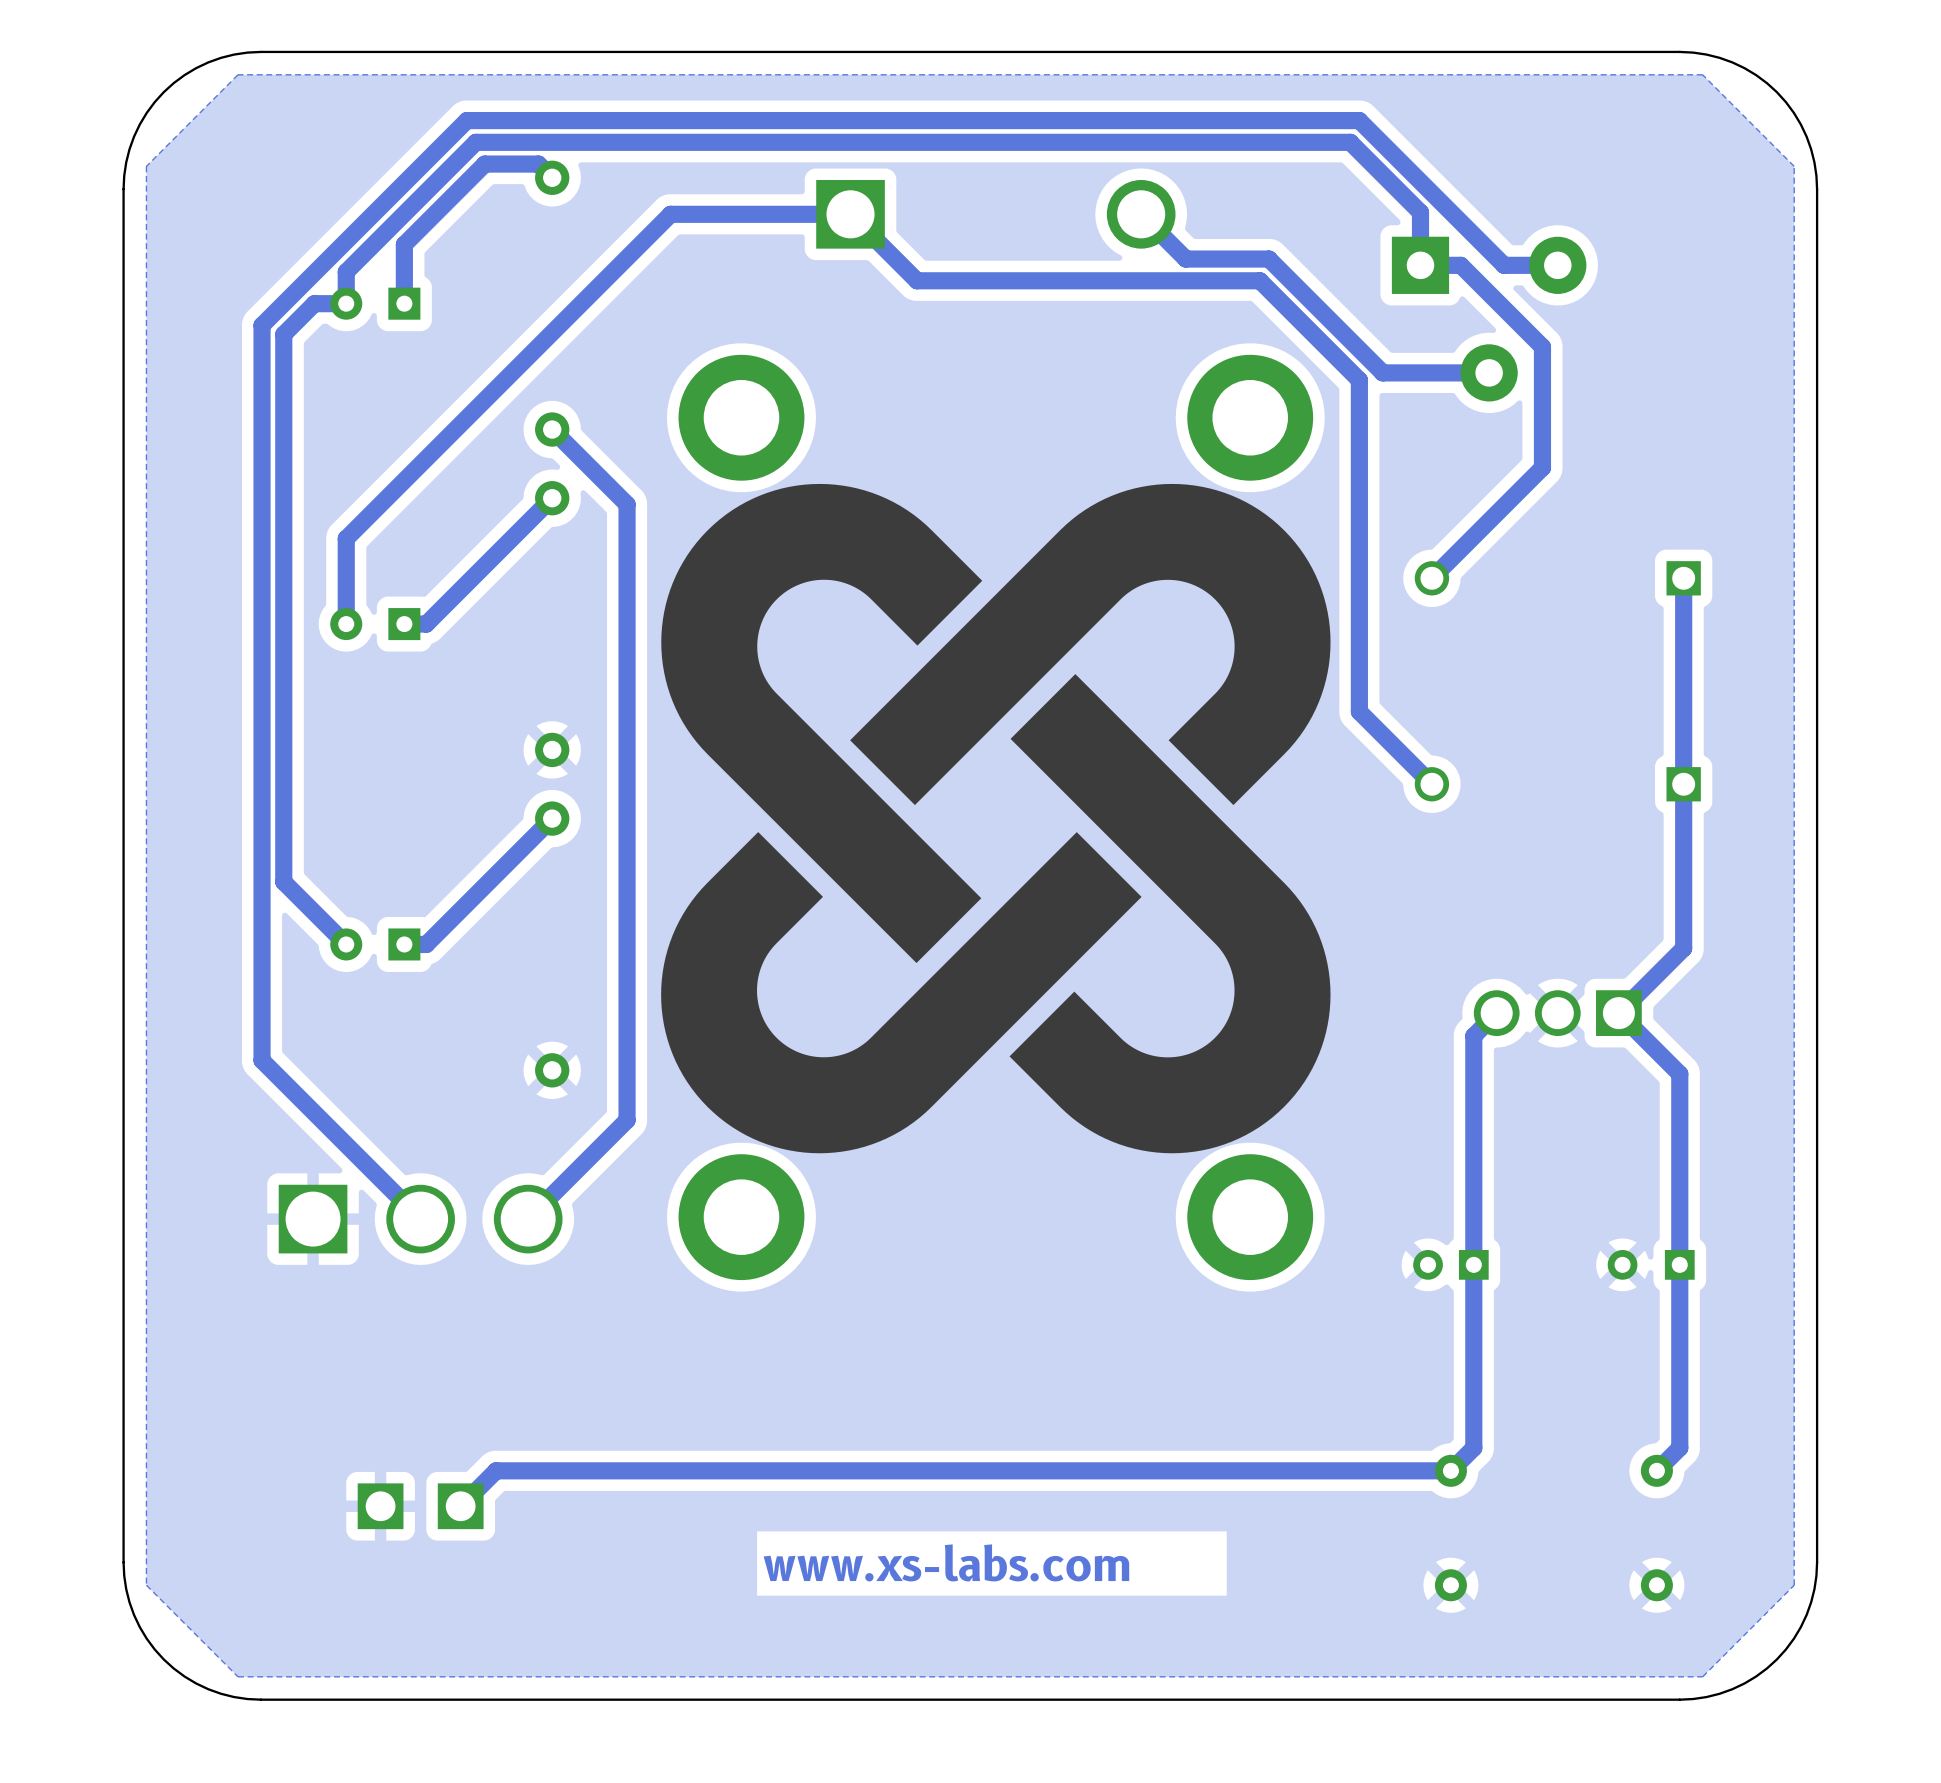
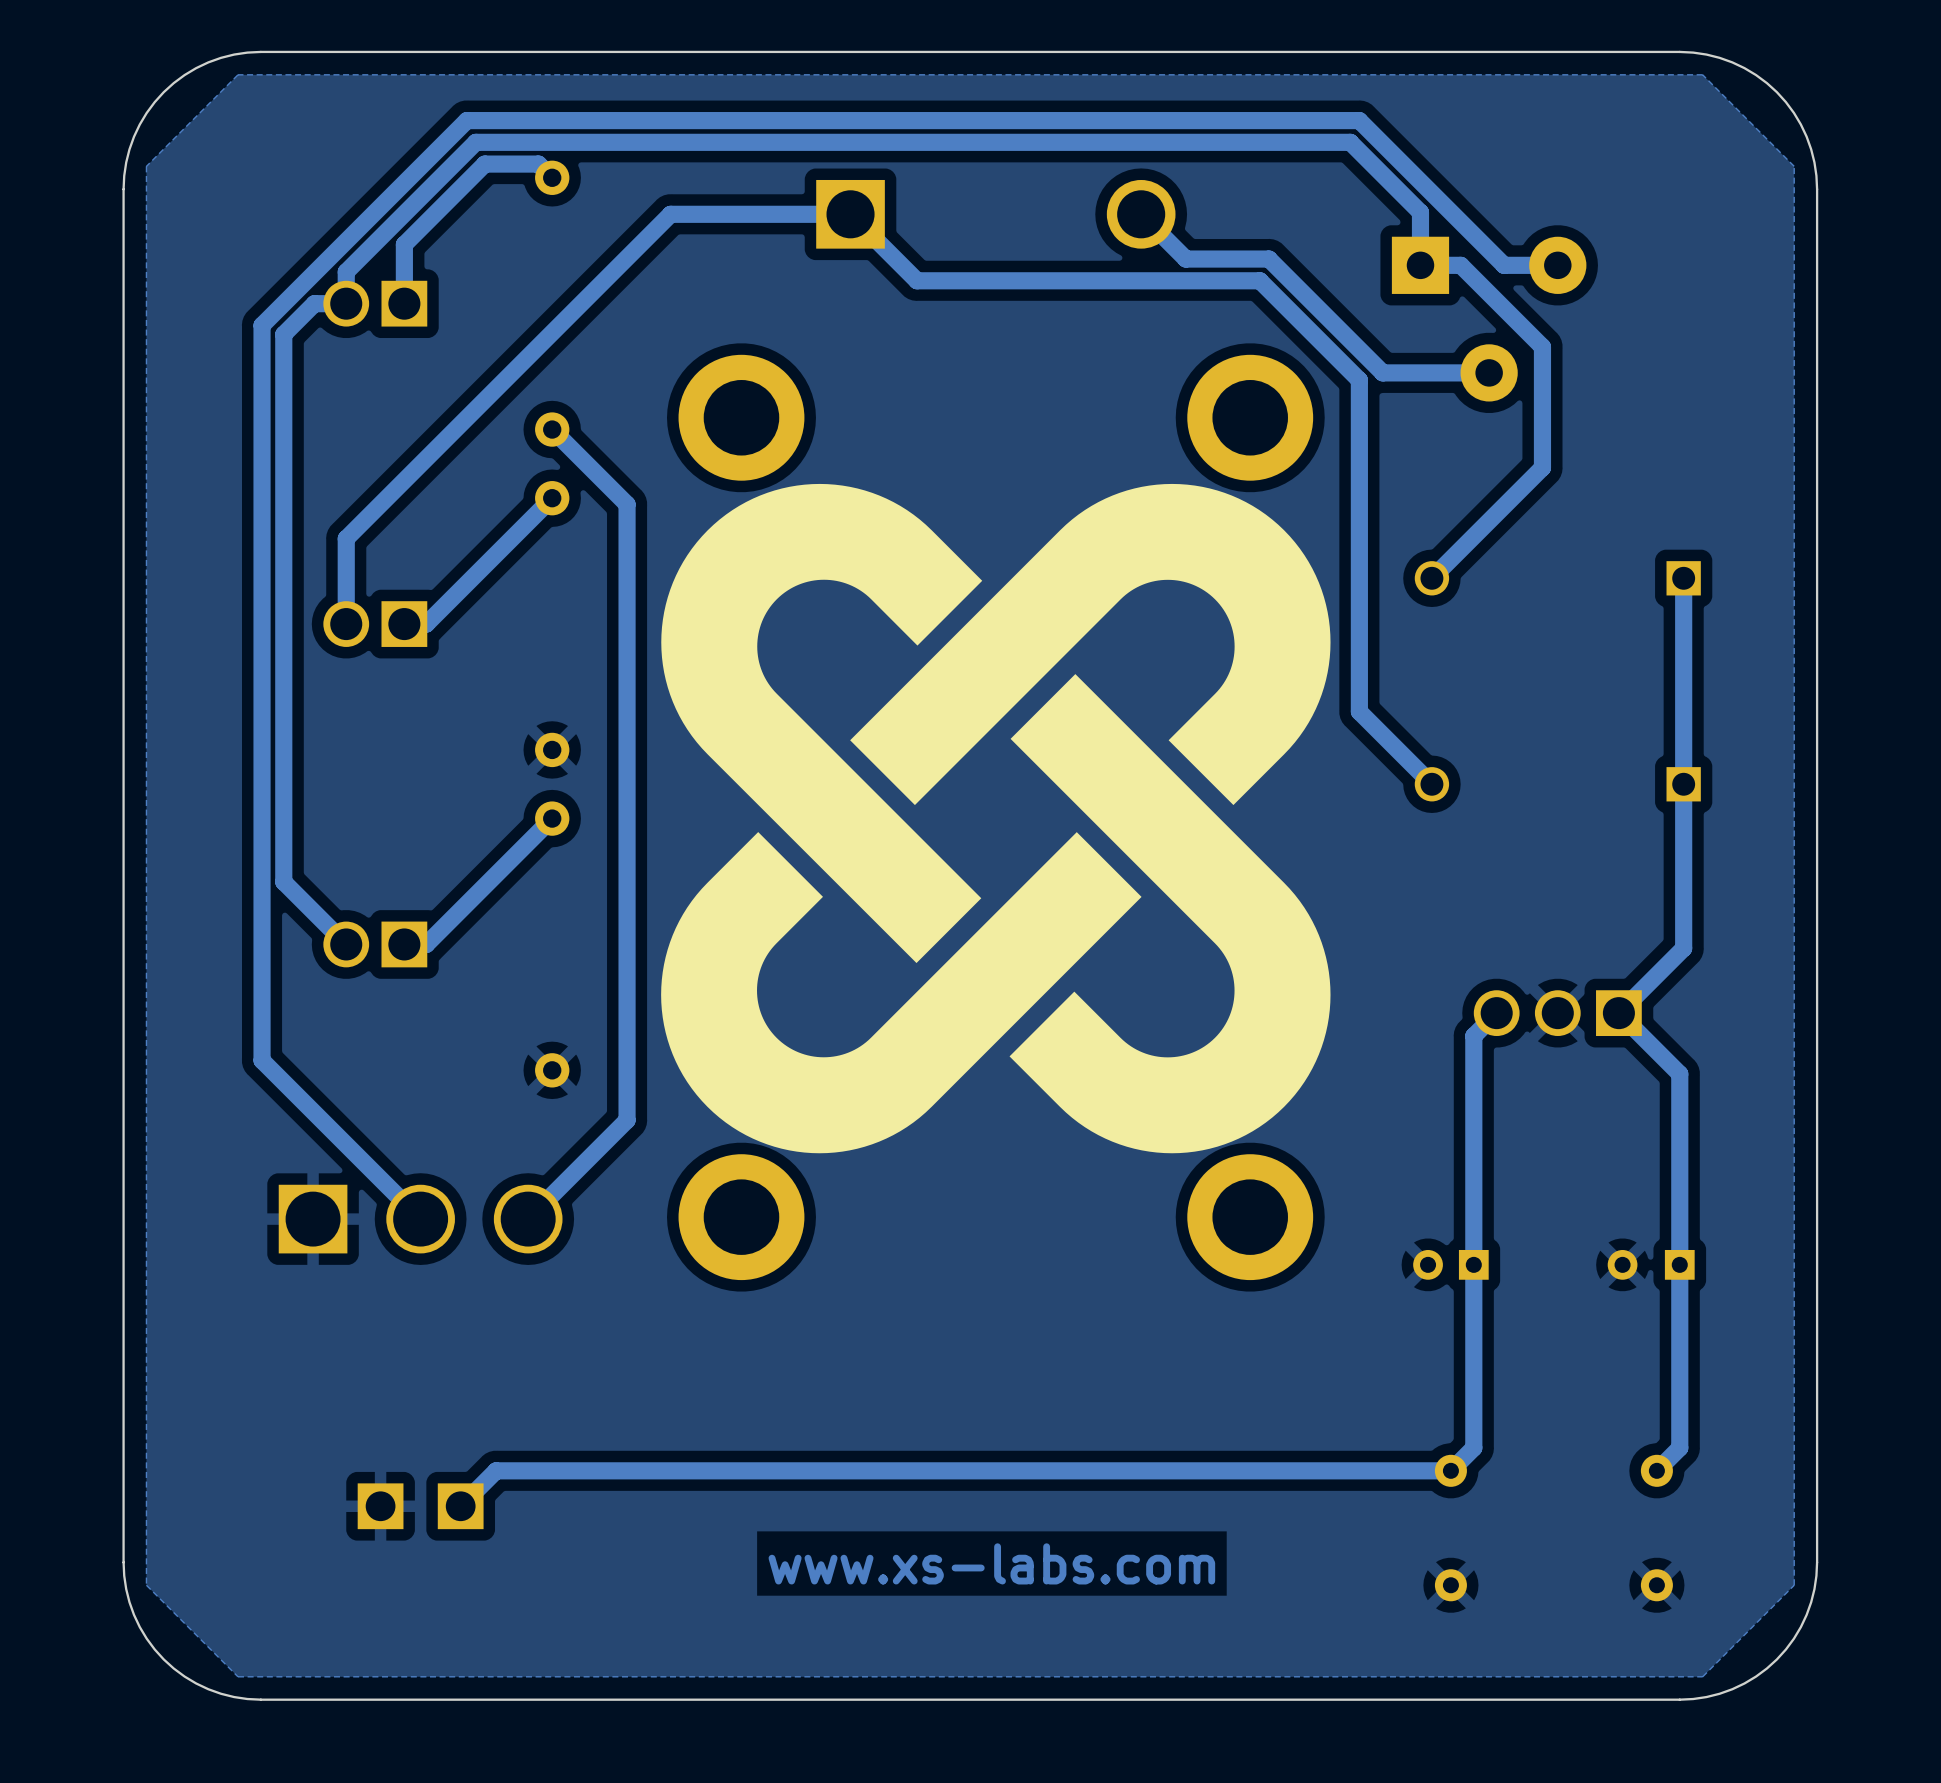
part footprint: [330, 287, 421, 320] -> [323, 280, 428, 327]
part footprint: [330, 608, 421, 641] -> [323, 601, 428, 647]
part footprint: [330, 928, 421, 961] -> [323, 921, 428, 968]

